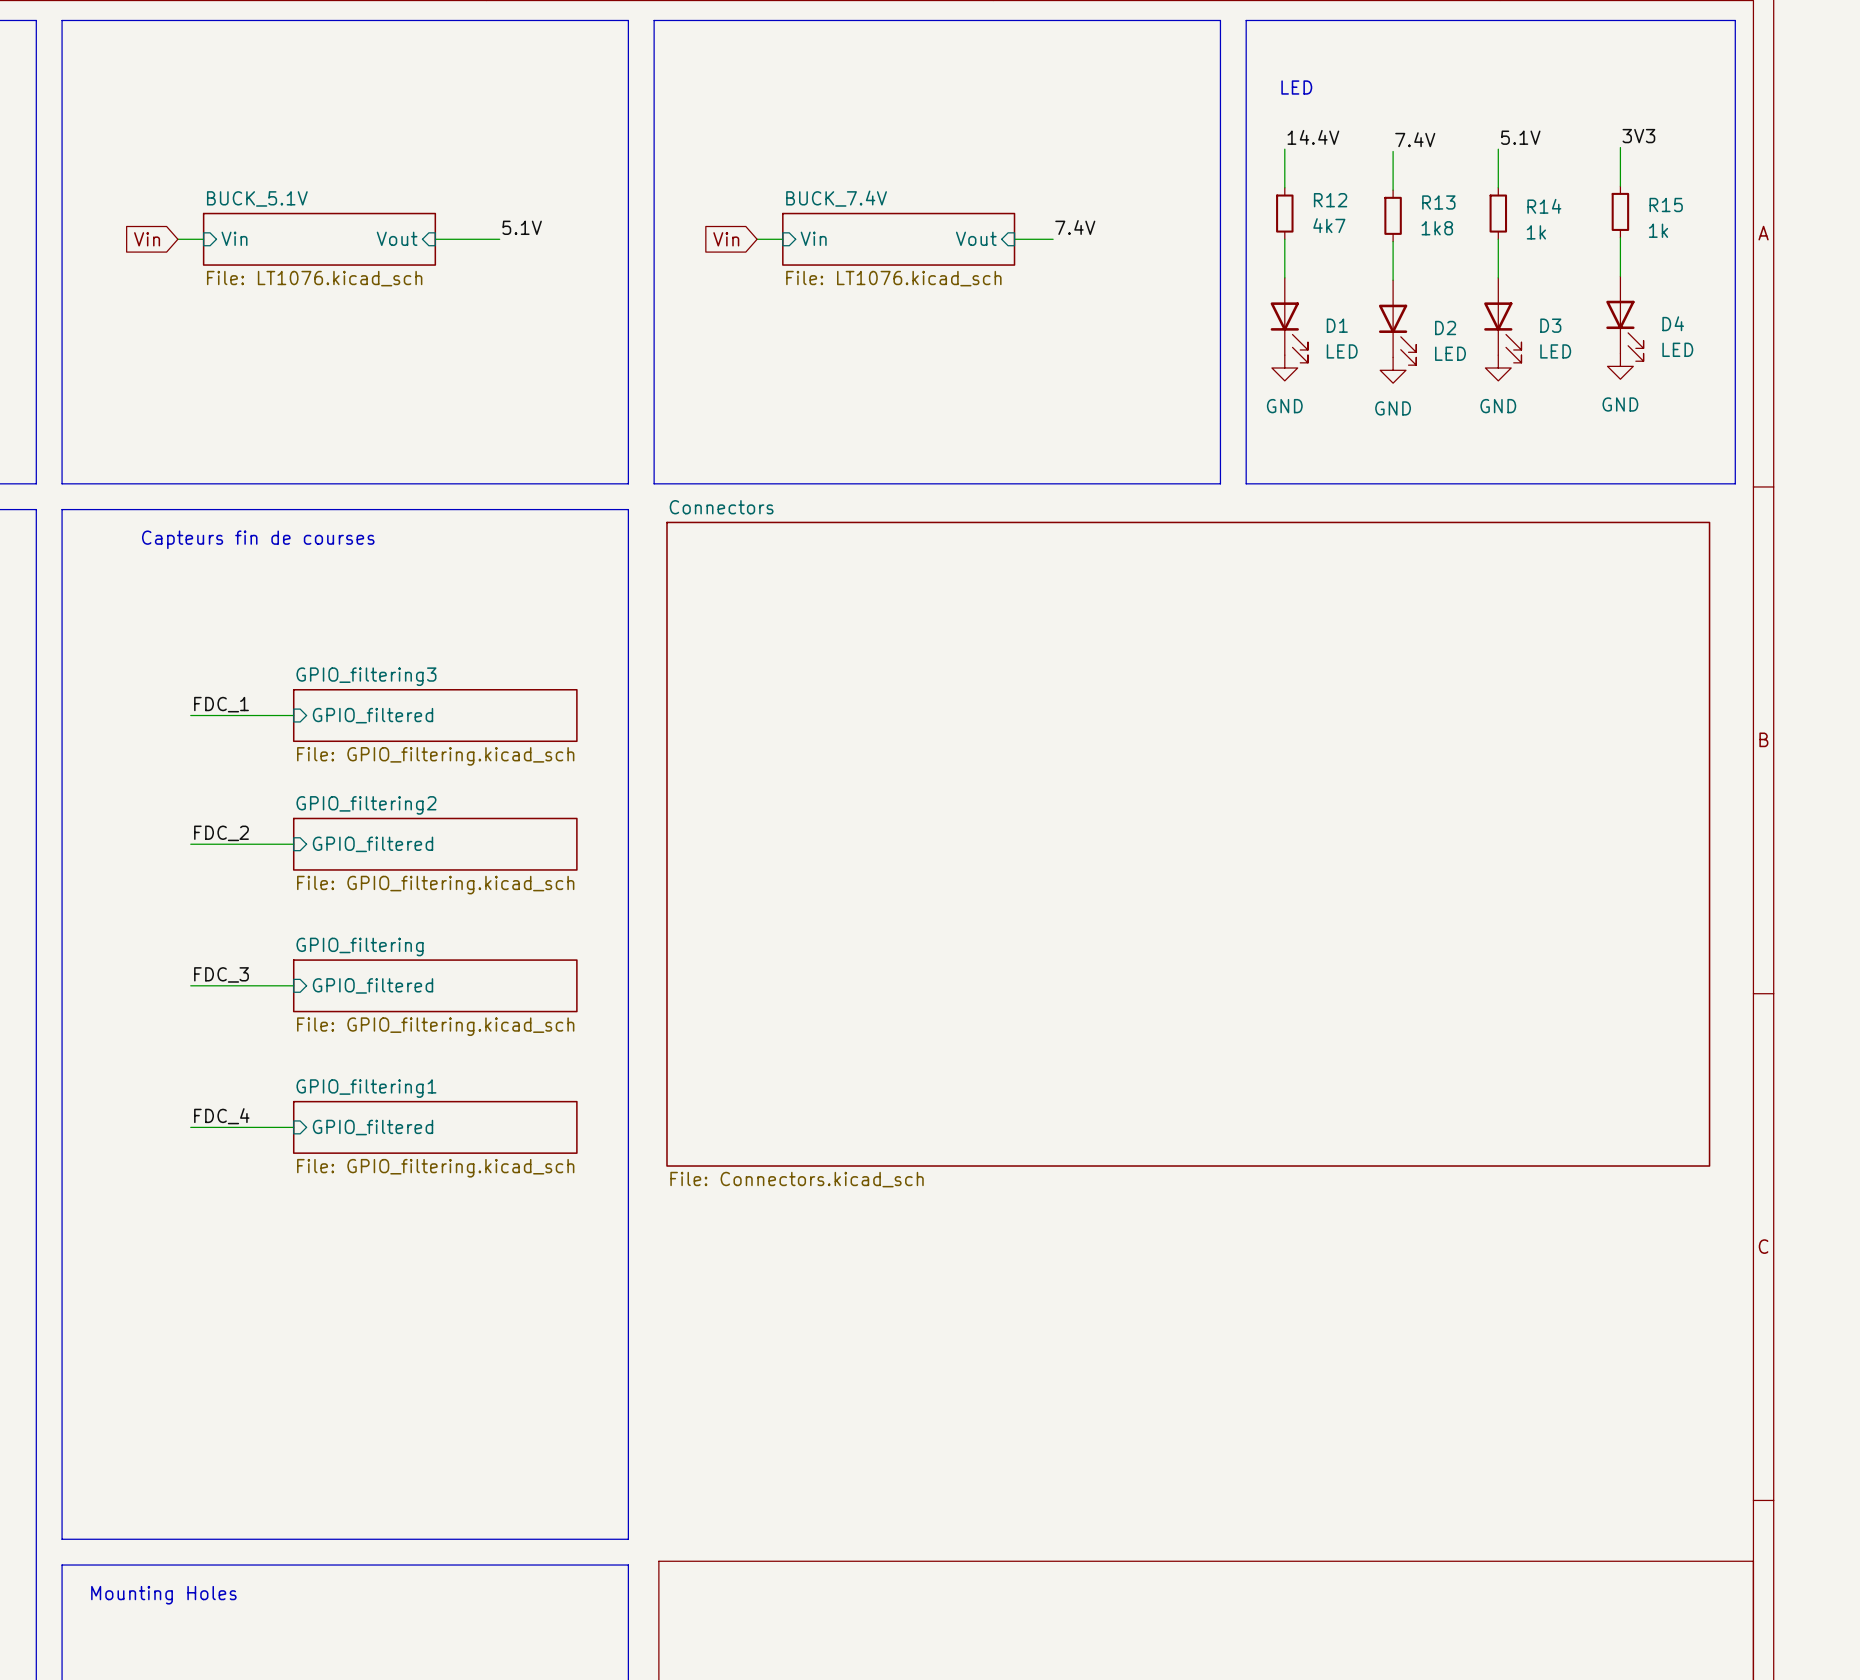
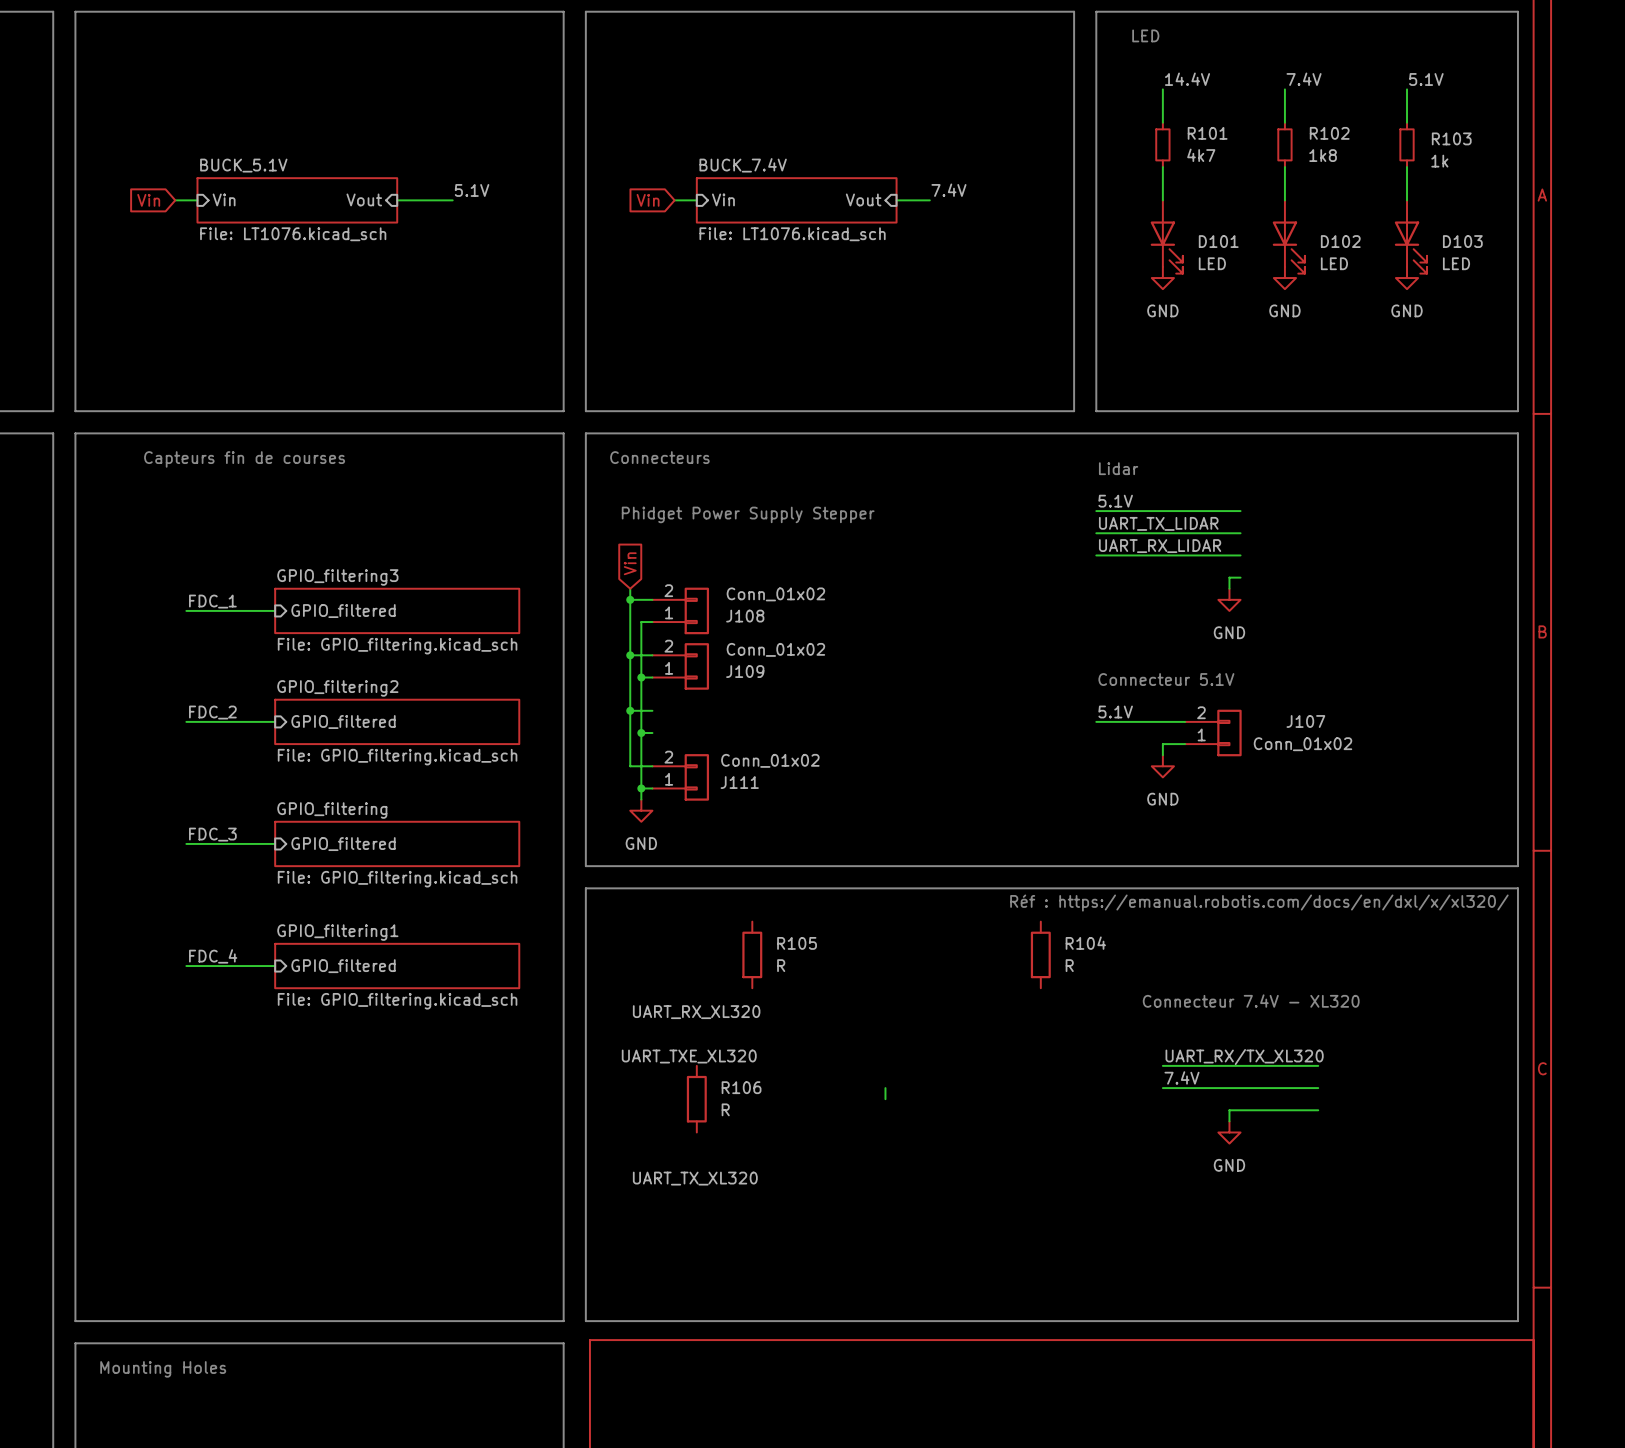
text position: LED (1296, 87) -> LED (1145, 35)
label: 3V3 (1638, 136) -> none
label position: 14.4V (1313, 137) -> 14.4V (1187, 79)
label position: 5.1V (1520, 137) -> 5.1V (1426, 79)
label position: 7.4V (1415, 139) -> 7.4V (1304, 79)
wire: (1620, 147) (1620, 186) -> (1407, 89) (1407, 122)
wire: (1284, 149) (1284, 187) -> (1162, 89) (1162, 122)
wire: (1498, 149) (1498, 187) -> (1284, 89) (1284, 122)
wire: (1393, 151) (1393, 190) -> none
R101: none -> 4k7 (1162, 144)
R102: none -> 1k8 (1284, 144)
R103: none -> 1k (1407, 144)
R15: 1k (1620, 211) -> none
R12: 4k7 (1284, 213) -> none
R14: 1k (1498, 213) -> none
R13: 1k8 (1393, 215) -> none
wire: (1620, 237) (1620, 276) -> (1407, 167) (1407, 200)
wire: (1284, 239) (1284, 277) -> (1162, 167) (1162, 200)
wire: (1498, 239) (1498, 277) -> (1284, 167) (1284, 200)
wire: (1393, 241) (1393, 280) -> none
D101: none -> LED (1166, 236)
D102: none -> LED (1288, 236)
D103: none -> LED (1410, 236)
D4: LED (1624, 318) -> none
D1: LED (1289, 320) -> none
D3: LED (1502, 320) -> none
D2: LED (1397, 322) -> none
power symbol: none -> GND (1162, 278)
power symbol: none -> GND (1284, 278)
power symbol position: GND (1620, 366) -> GND (1407, 278)
power symbol: GND (1284, 368) -> none
power symbol: GND (1498, 368) -> none
power symbol: GND (1393, 370) -> none
line: none -> (585, 433) (1517, 433) (1517, 866) (585, 866) (585, 433)
text: none -> Connecteurs (659, 457)
text: none -> Lidar (1118, 468)
label: none -> 5.1V (1115, 501)
wire: none -> (1096, 511) (1240, 511)
text: none -> Phidget Power Supply Stepper (748, 514)
label: none -> UART_TX_LIDAR (1158, 523)
wire: none -> (1096, 533) (1240, 533)
label: none -> UART_RX_LIDAR (1160, 546)
wire: none -> (1096, 555) (1240, 555)
global label: none -> Vin (630, 563)
wire: none -> (1240, 577) (1229, 577) (1229, 588)
wire: none -> (630, 588) (630, 766) (652, 766)
wire: none -> (630, 599) (652, 599)
junction: none -> (630, 599)
power symbol: none -> GND (1229, 599)
J108: none -> Conn_01x02 (680, 610)
wire: none -> (652, 622) (641, 622) (641, 799)
wire: none -> (630, 655) (652, 655)
junction: none -> (630, 655)
J109: none -> Conn_01x02 (680, 666)
wire: none -> (641, 677) (652, 677)
junction: none -> (641, 677)
text: none -> Connecteur 5.1V (1166, 679)
wire: none -> (630, 710) (652, 710)
junction: none -> (630, 710)
label: none -> 5.1V (1115, 712)
sheet Connectors: File: Connectors.kicad_sch (1188, 844) -> none
wire: none -> (1096, 721) (1185, 721)
wire: none -> (641, 733) (652, 733)
junction: none -> (641, 733)
J107: none -> Conn_01x02 (1213, 733)
wire: none -> (1185, 744) (1162, 744) (1162, 755)
power symbol: none -> GND (1162, 766)
J111: none -> Conn_01x02 (680, 777)
wire: none -> (641, 788) (652, 788)
junction: none -> (641, 788)
power symbol: none -> GND (641, 810)
line: none -> (585, 888) (585, 1321) (1517, 1321) (1517, 888) (585, 888)
text: none -> Réf : https://emanual.robotis.com/docs/en/dxl/x/xl320/ (1259, 903)
R105: none -> R (752, 954)
R104: none -> R (1040, 954)
text: none -> Connecteur 7.4V - XL320 (1251, 1001)
label: none -> UART_RX_XL320 (696, 1012)
label: none -> UART_TXE_XL320 (689, 1056)
label: none -> UART_RX/TX_XL320 (1244, 1057)
wire: none -> (1162, 1065) (1318, 1065)
label: none -> 7.4V (1181, 1077)
wire: none -> (885, 1088) (885, 1099)
wire: none -> (1162, 1088) (1318, 1088)
R106: none -> R (696, 1099)
wire: none -> (1318, 1110) (1229, 1110) (1229, 1121)
power symbol: none -> GND (1229, 1132)
label: none -> UART_TX_XL320 (695, 1178)

